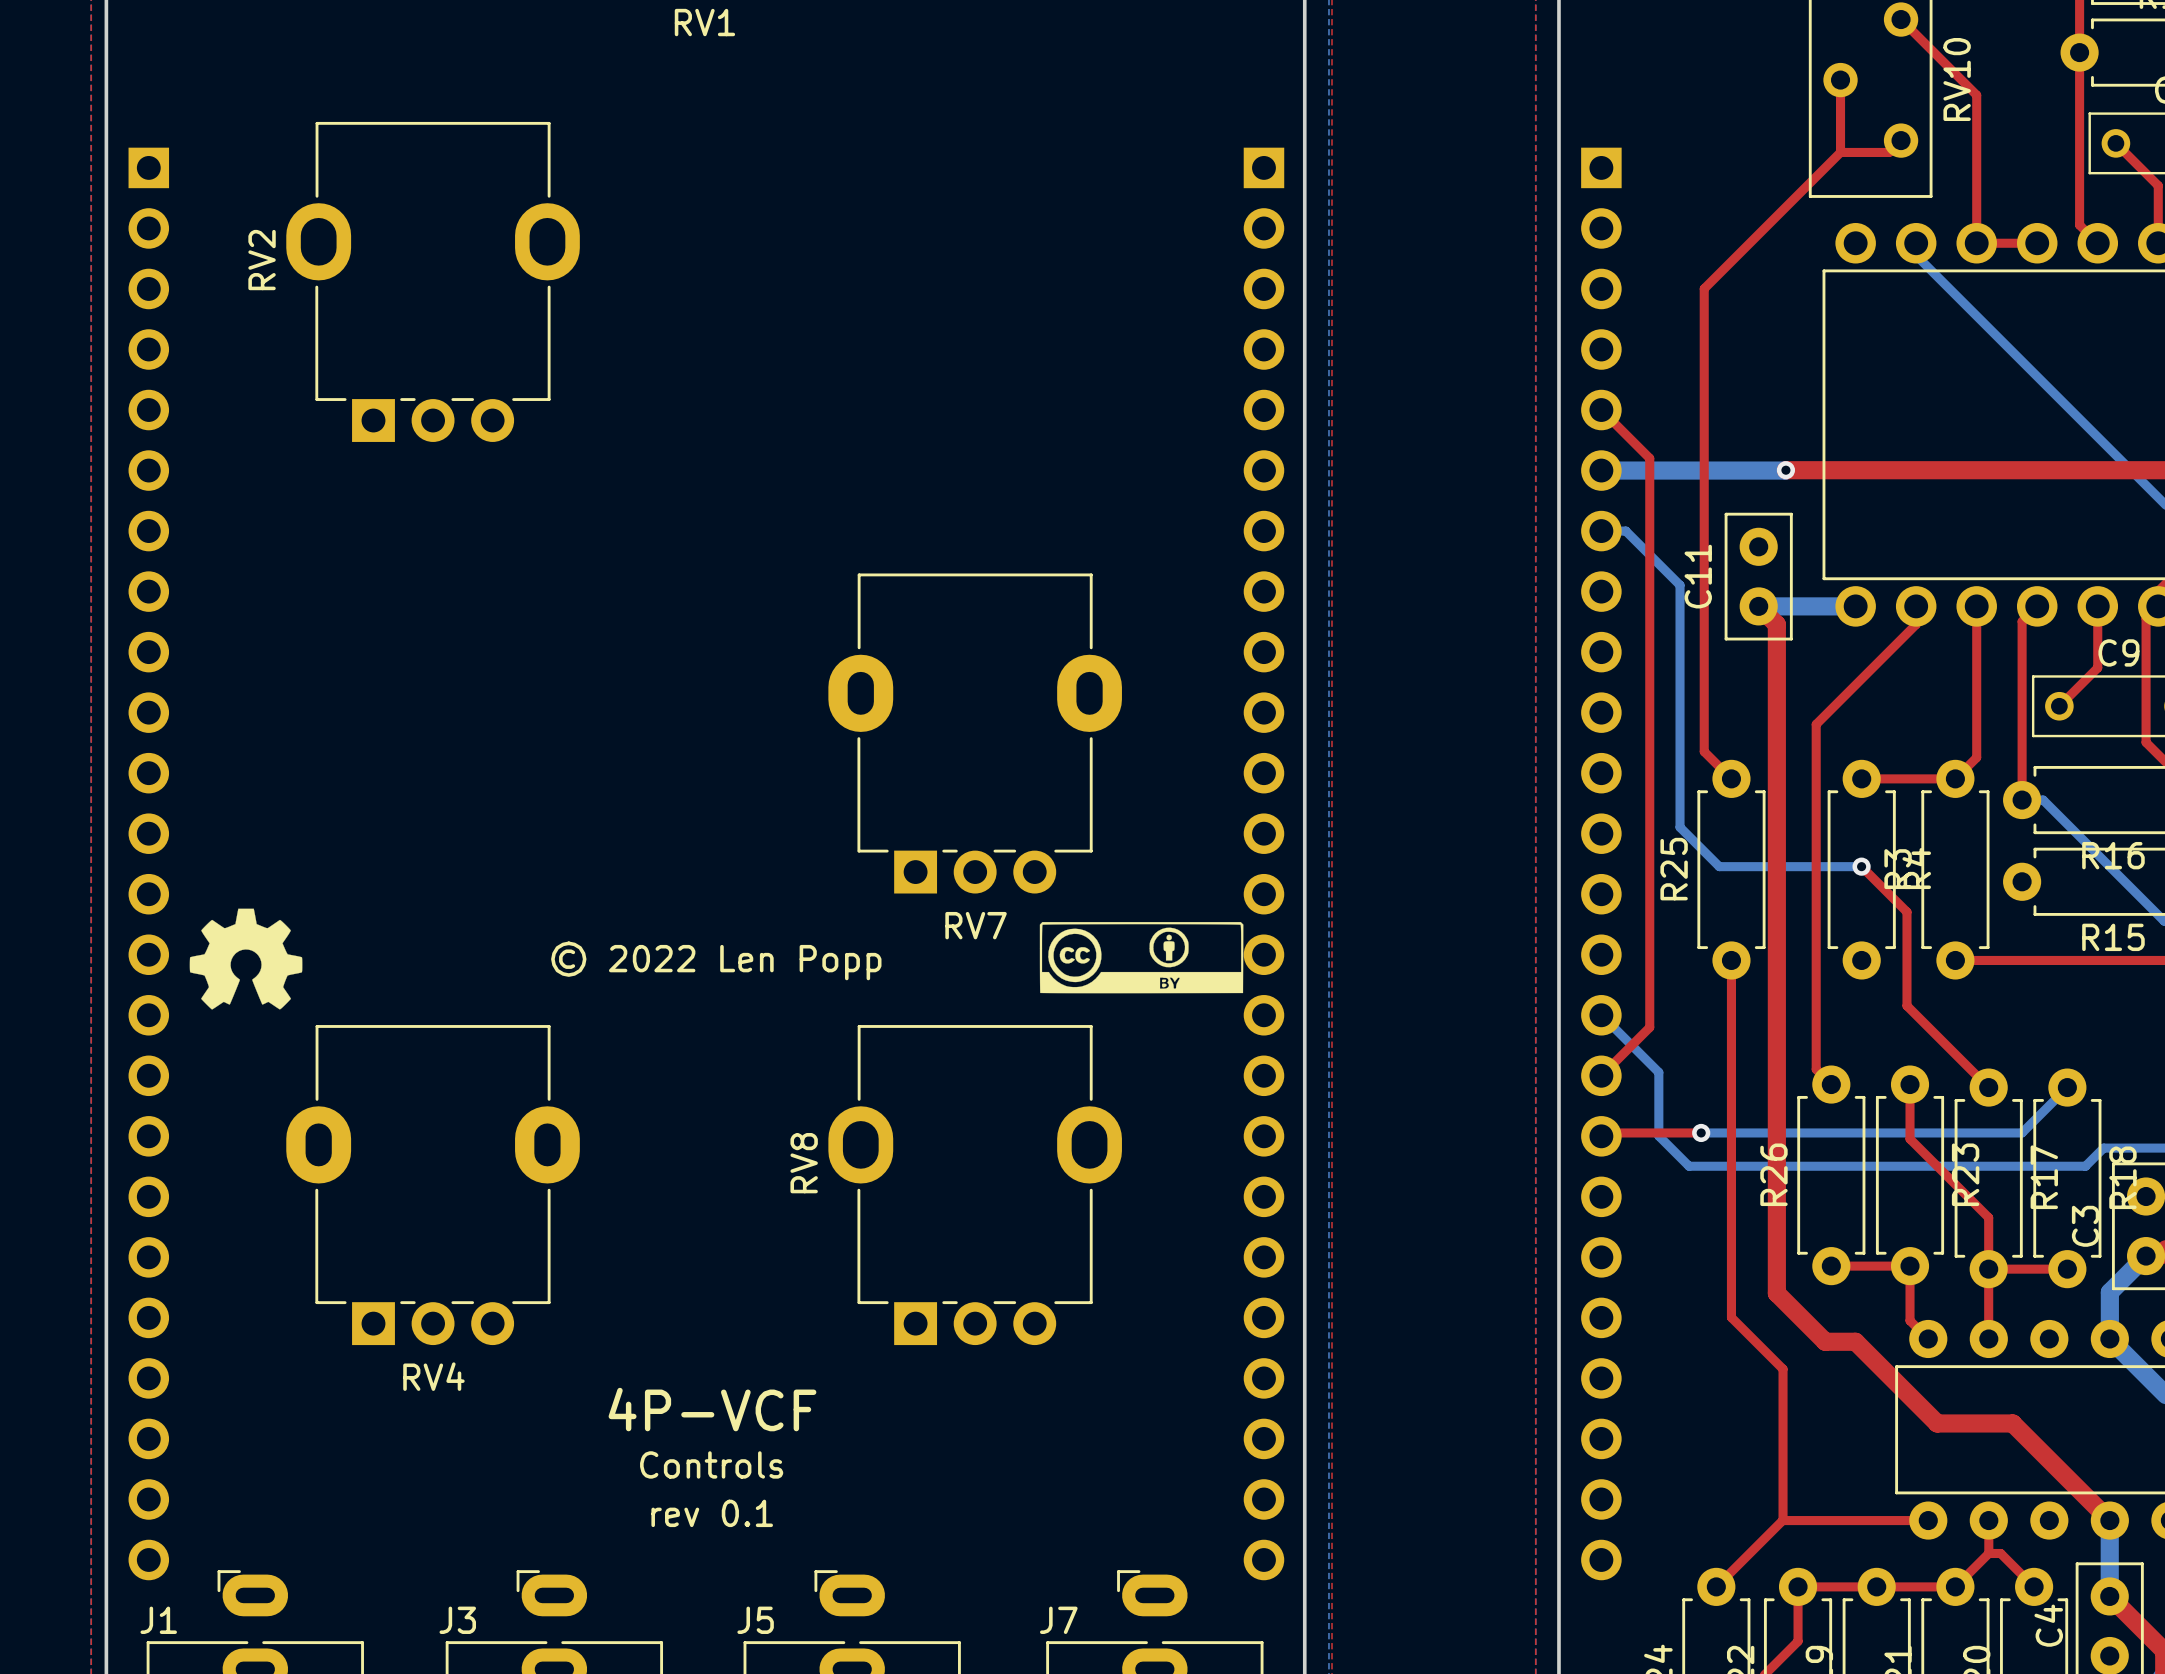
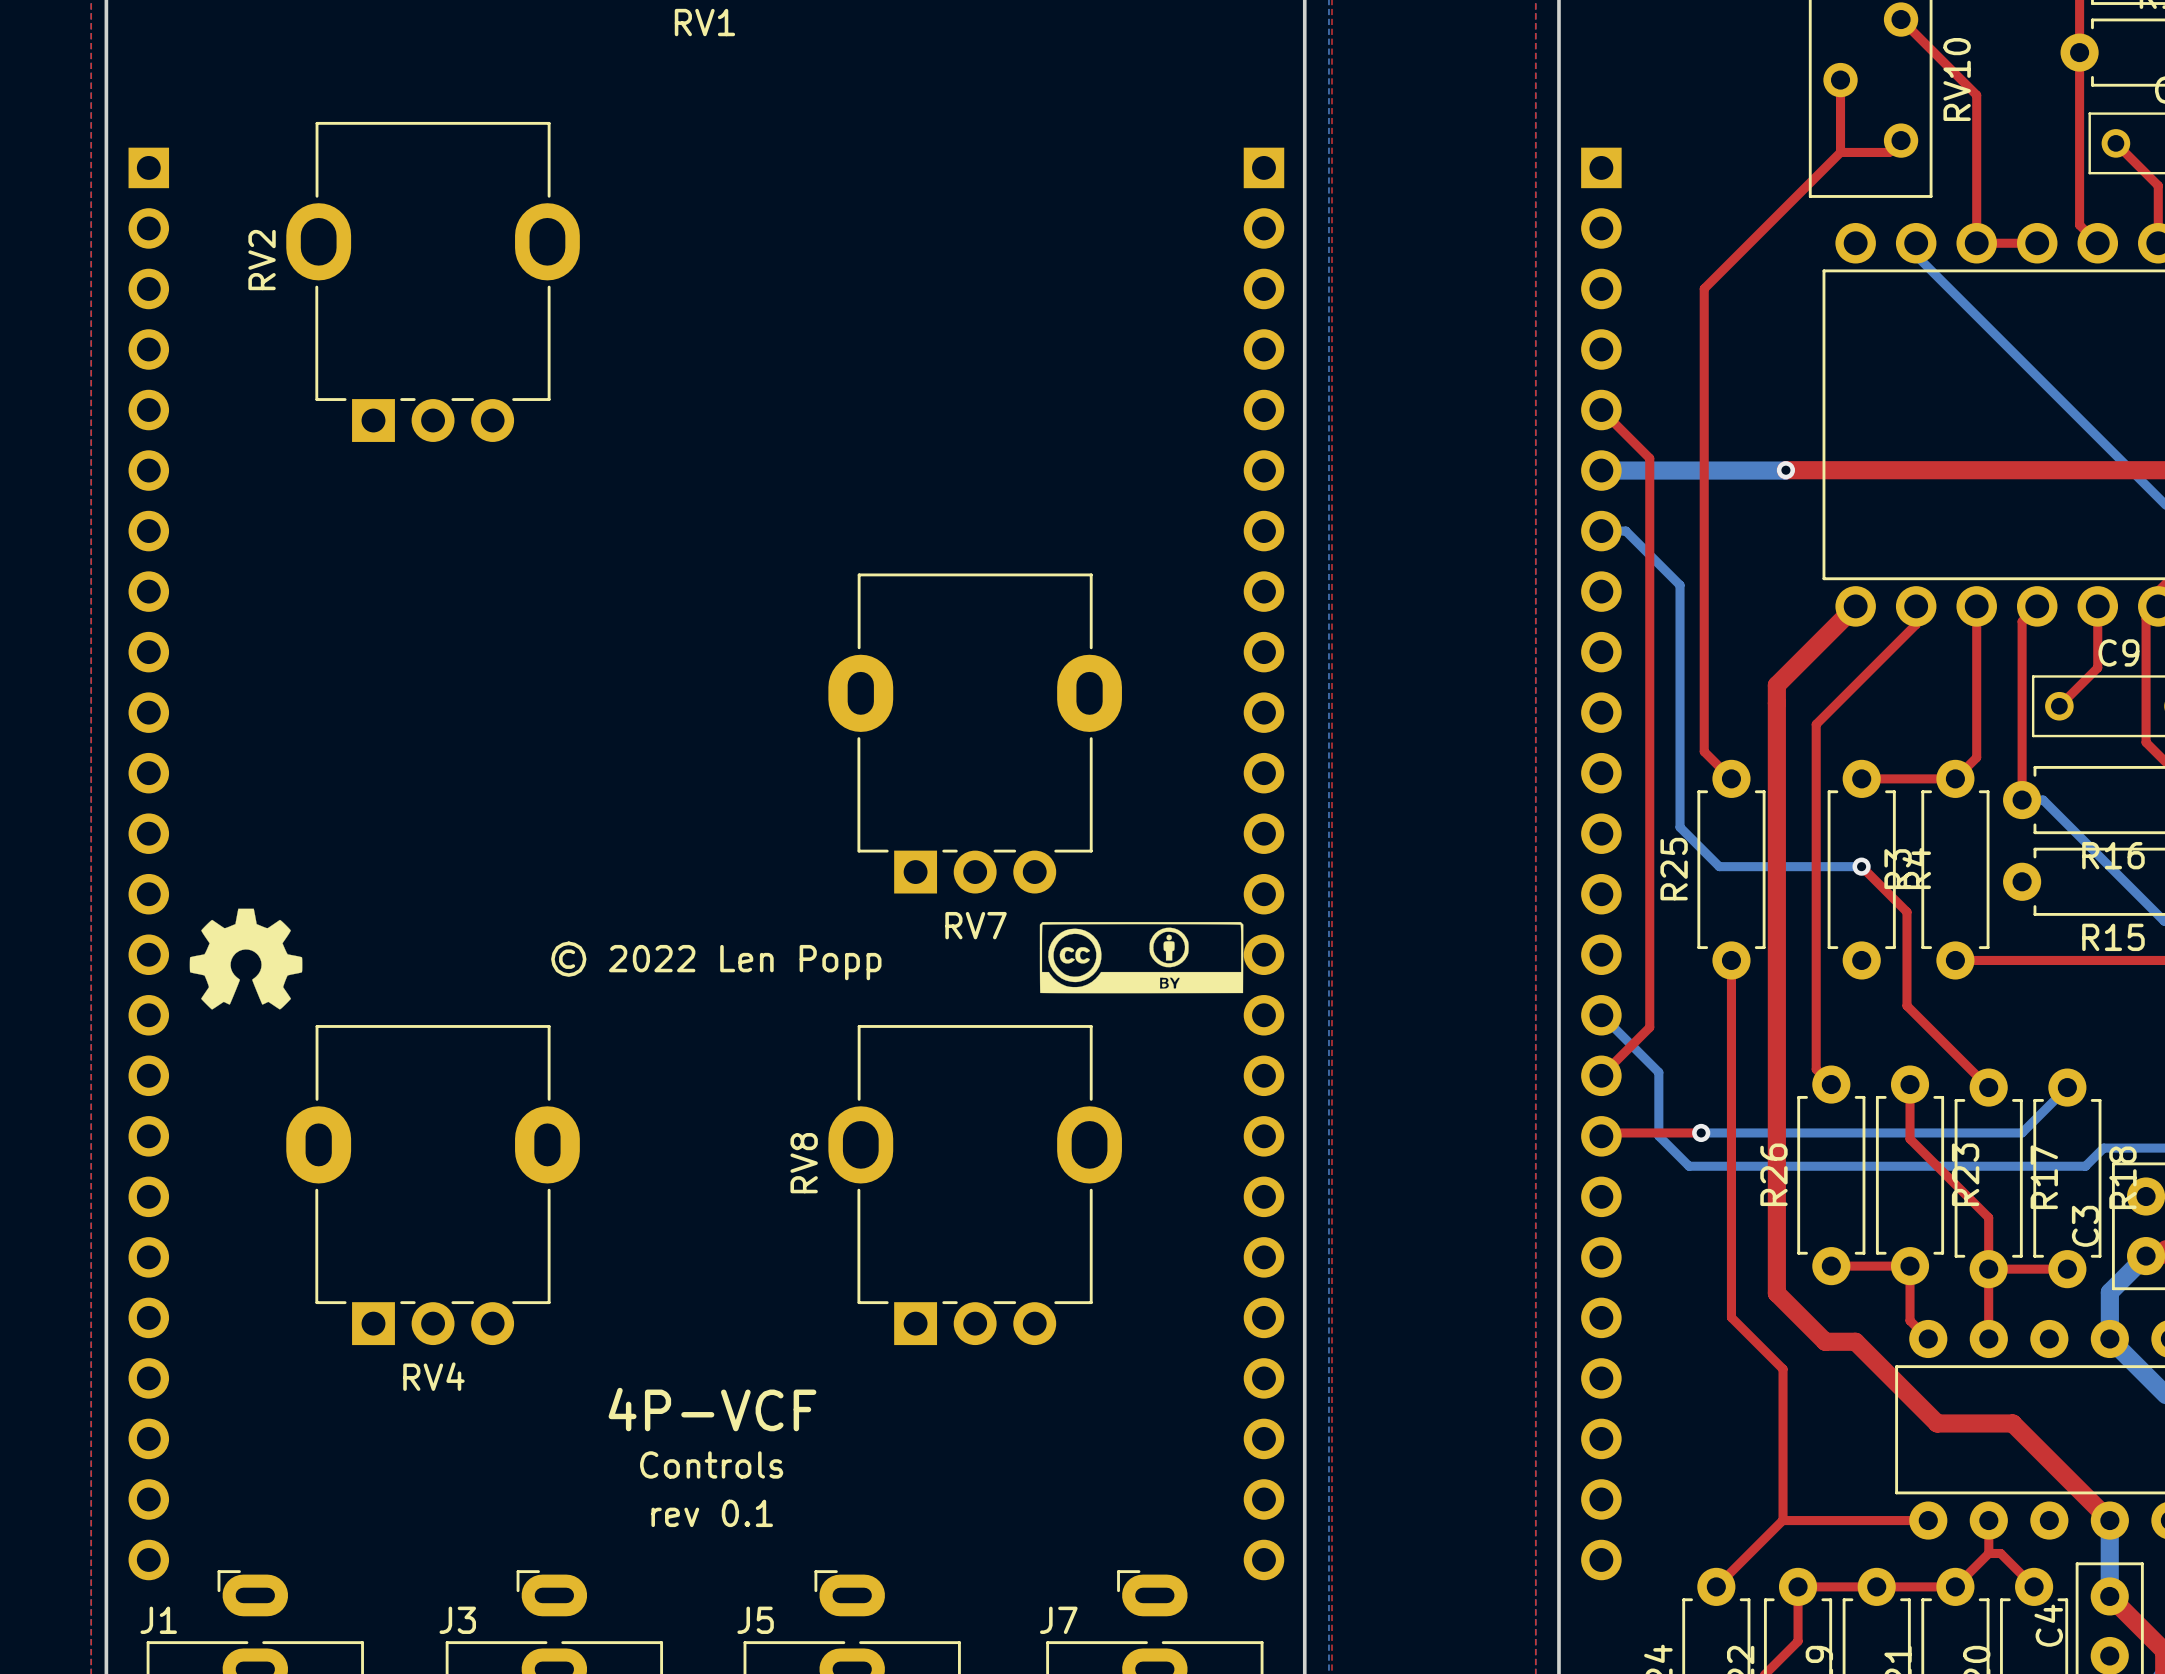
C11: (1758, 576) -> none
top track: (1758, 606) (1776, 624) (1776, 685) -> (1855, 606) (1776, 685)
bottom track: (1758, 606) (1855, 606) -> none

